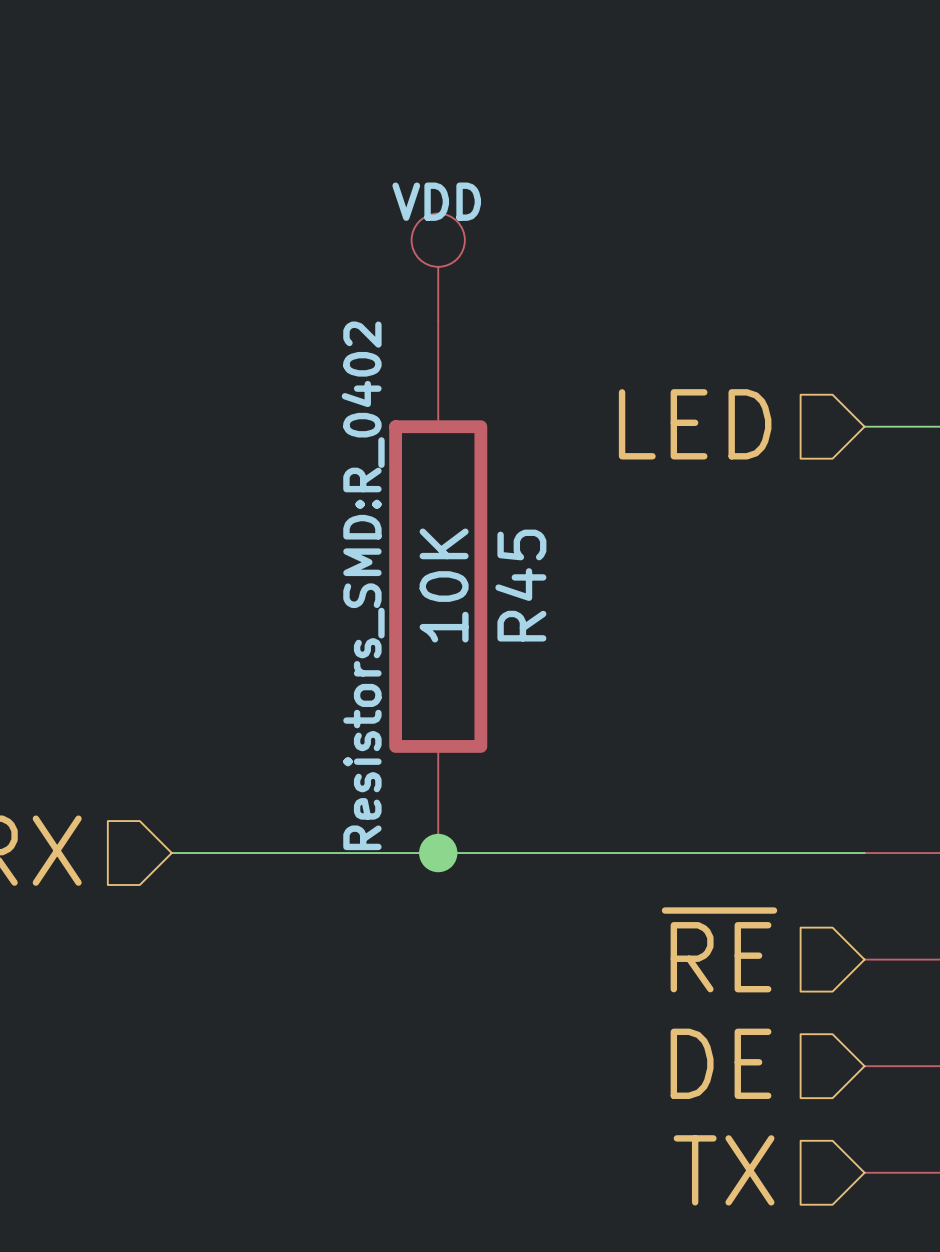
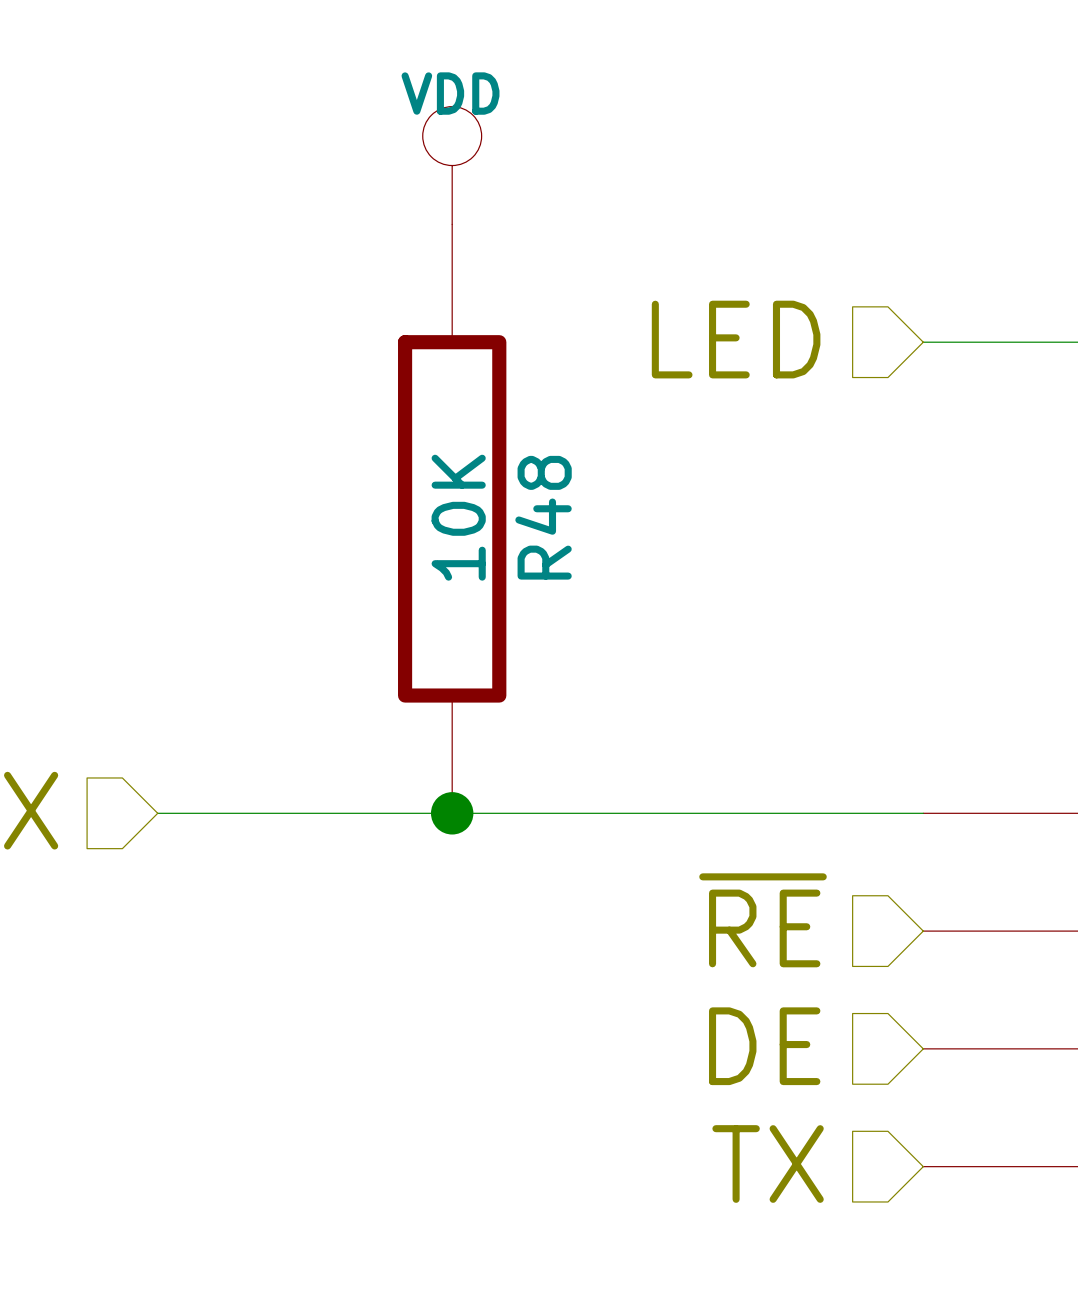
R45 text: Resistors_SMD:R_0402 (363, 585) -> none
R45 name: R45 (520, 585) -> R48 (543, 517)

